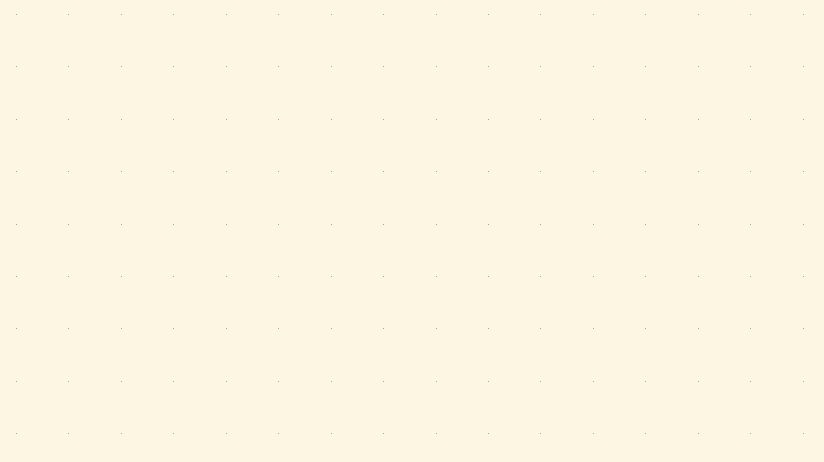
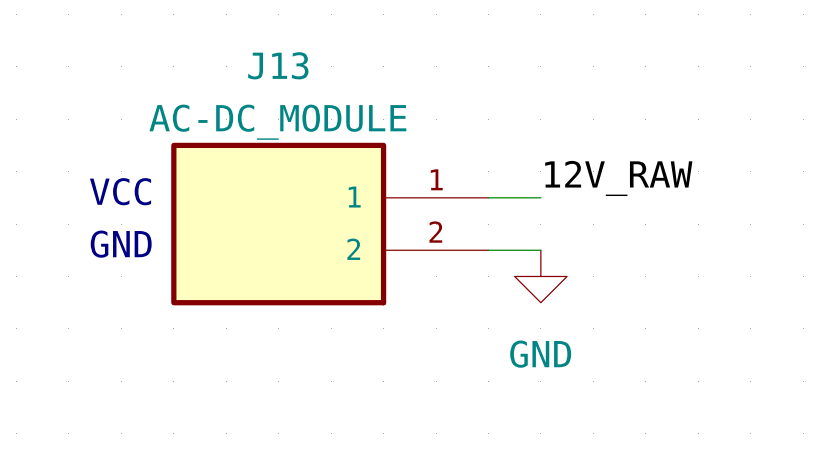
label: none -> 12V_RAW (618, 178)
text: none -> VCC (120, 191)
wire: none -> (488, 197) (540, 197)
J13: none -> AC-DC_MODULE (329, 224)
text: none -> GND (121, 244)
wire: none -> (488, 250) (540, 250)
power symbol: none -> GND (540, 276)

